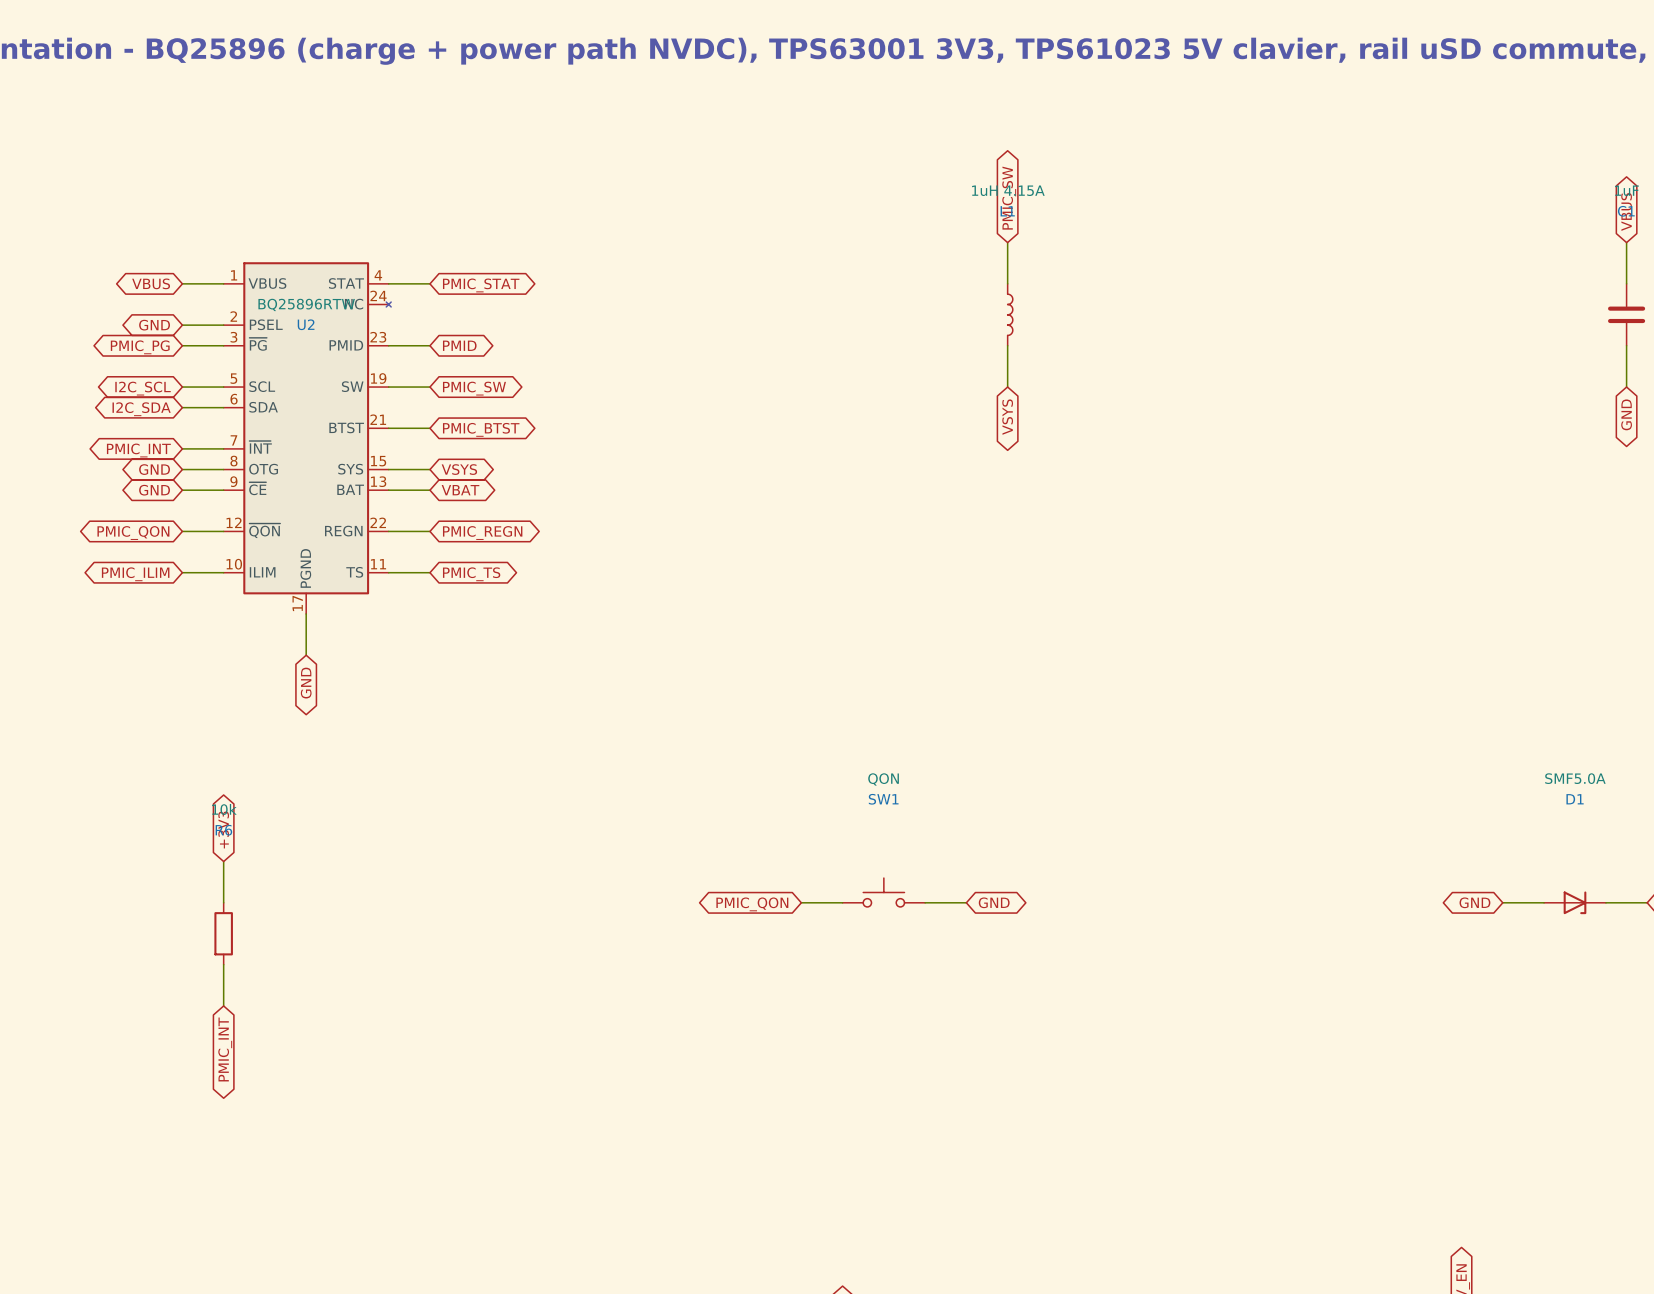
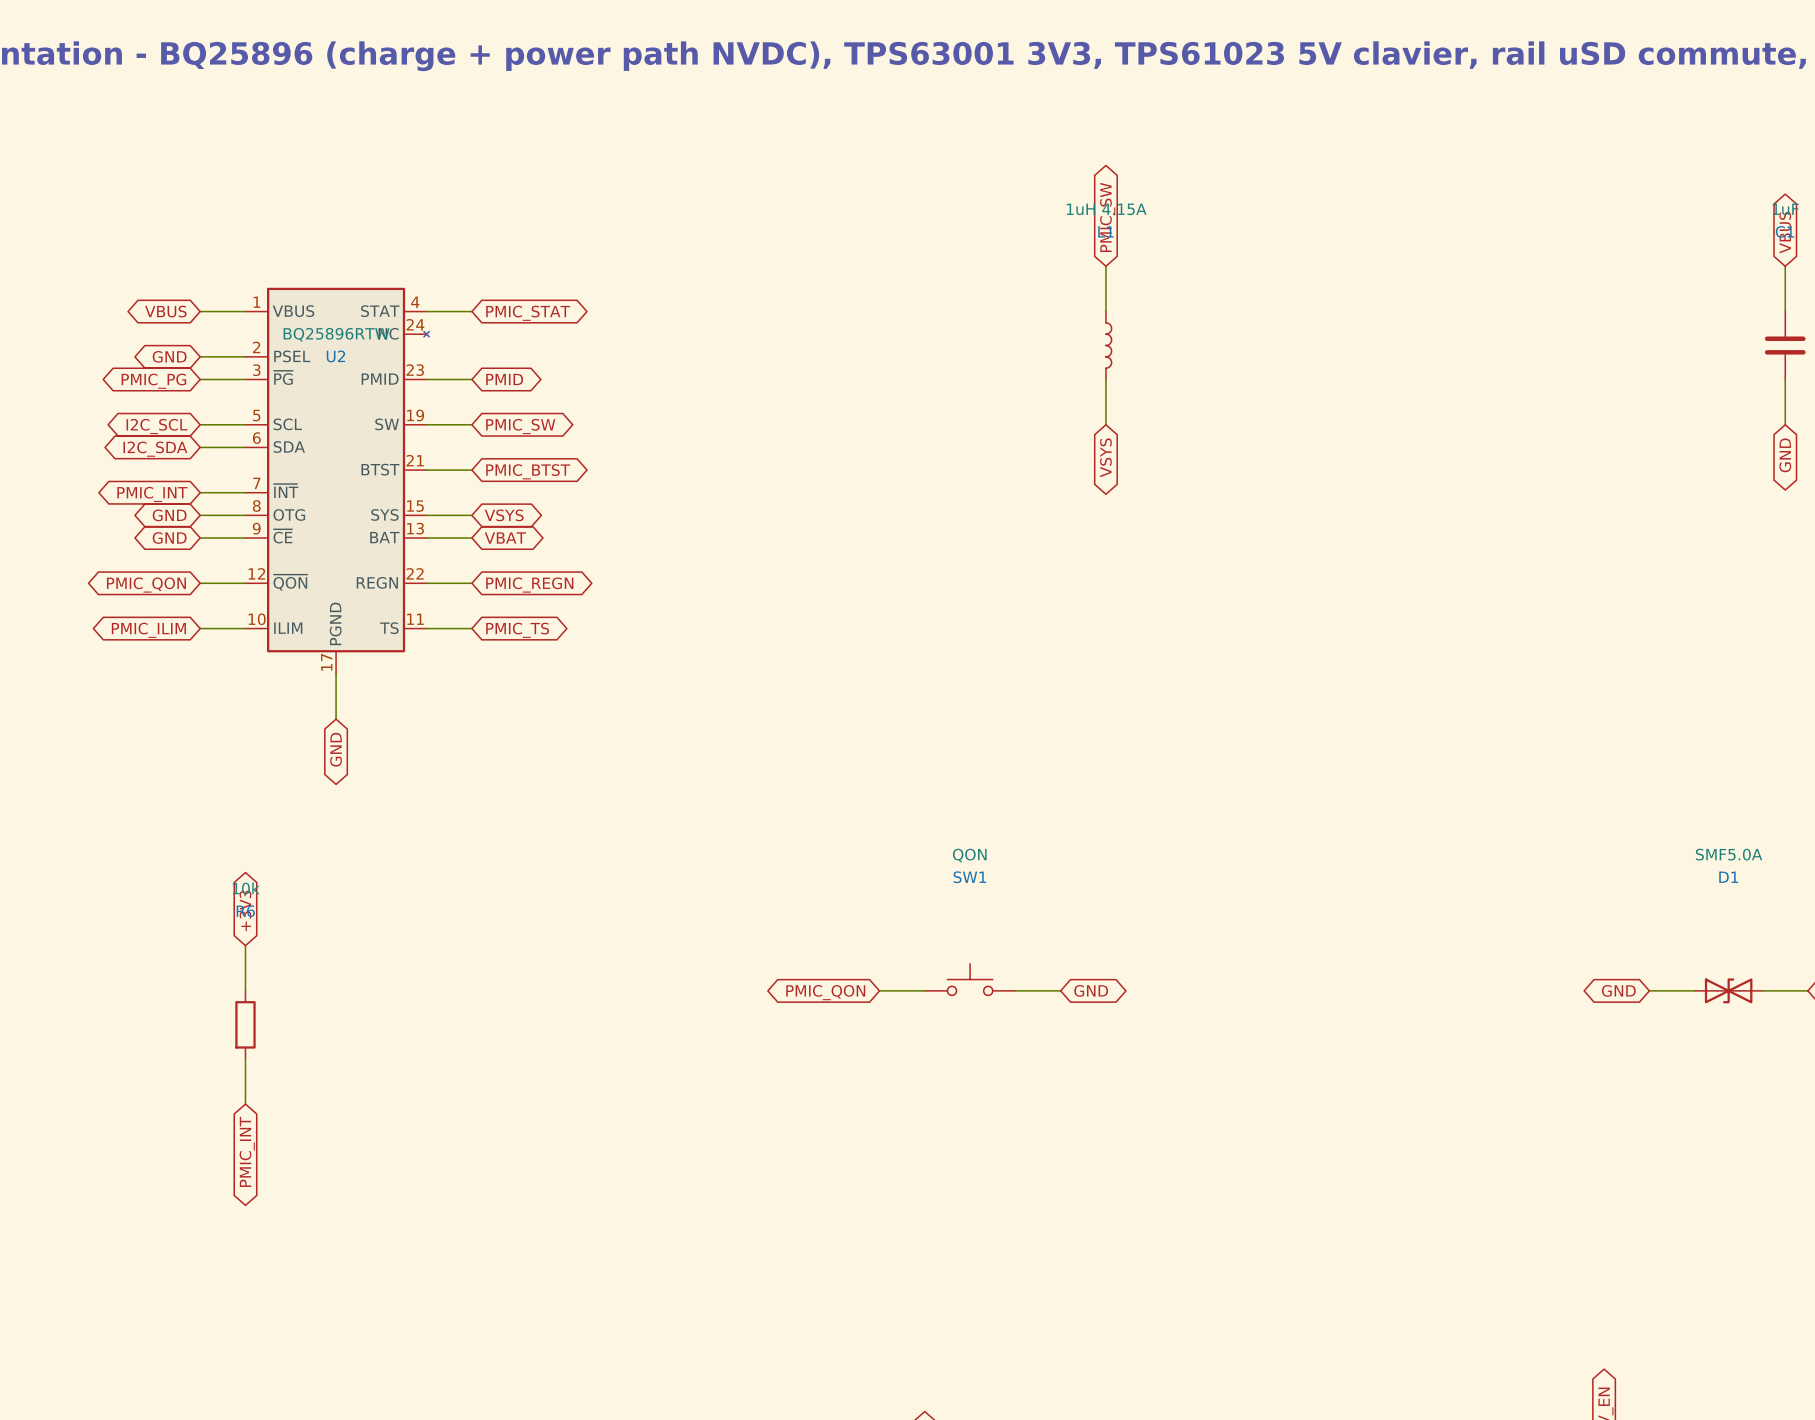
D1 symbol: [1544, 891, 1606, 915] -> [1694, 978, 1763, 1004]

